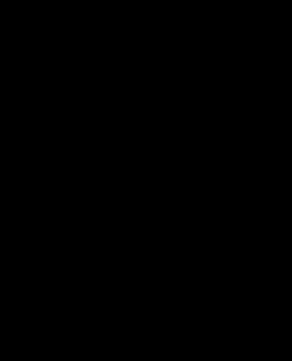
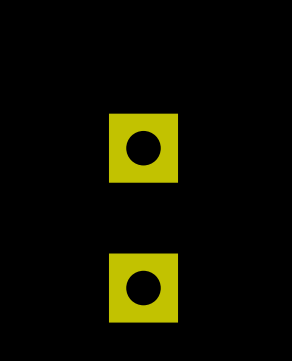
part: none -> (143, 148)
part: none -> (143, 288)

